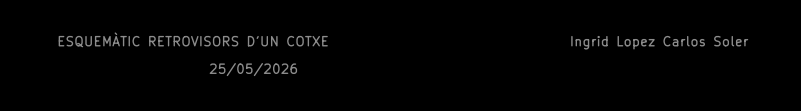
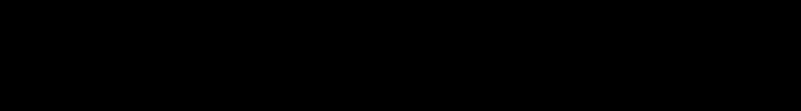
text: ESQUEMÀTIC RETROVISORS D'UN COTXE (193, 39) -> none
text: Ingrid Lopez Carlos Soler (659, 42) -> none
text: 25/05/2026 (253, 69) -> none

